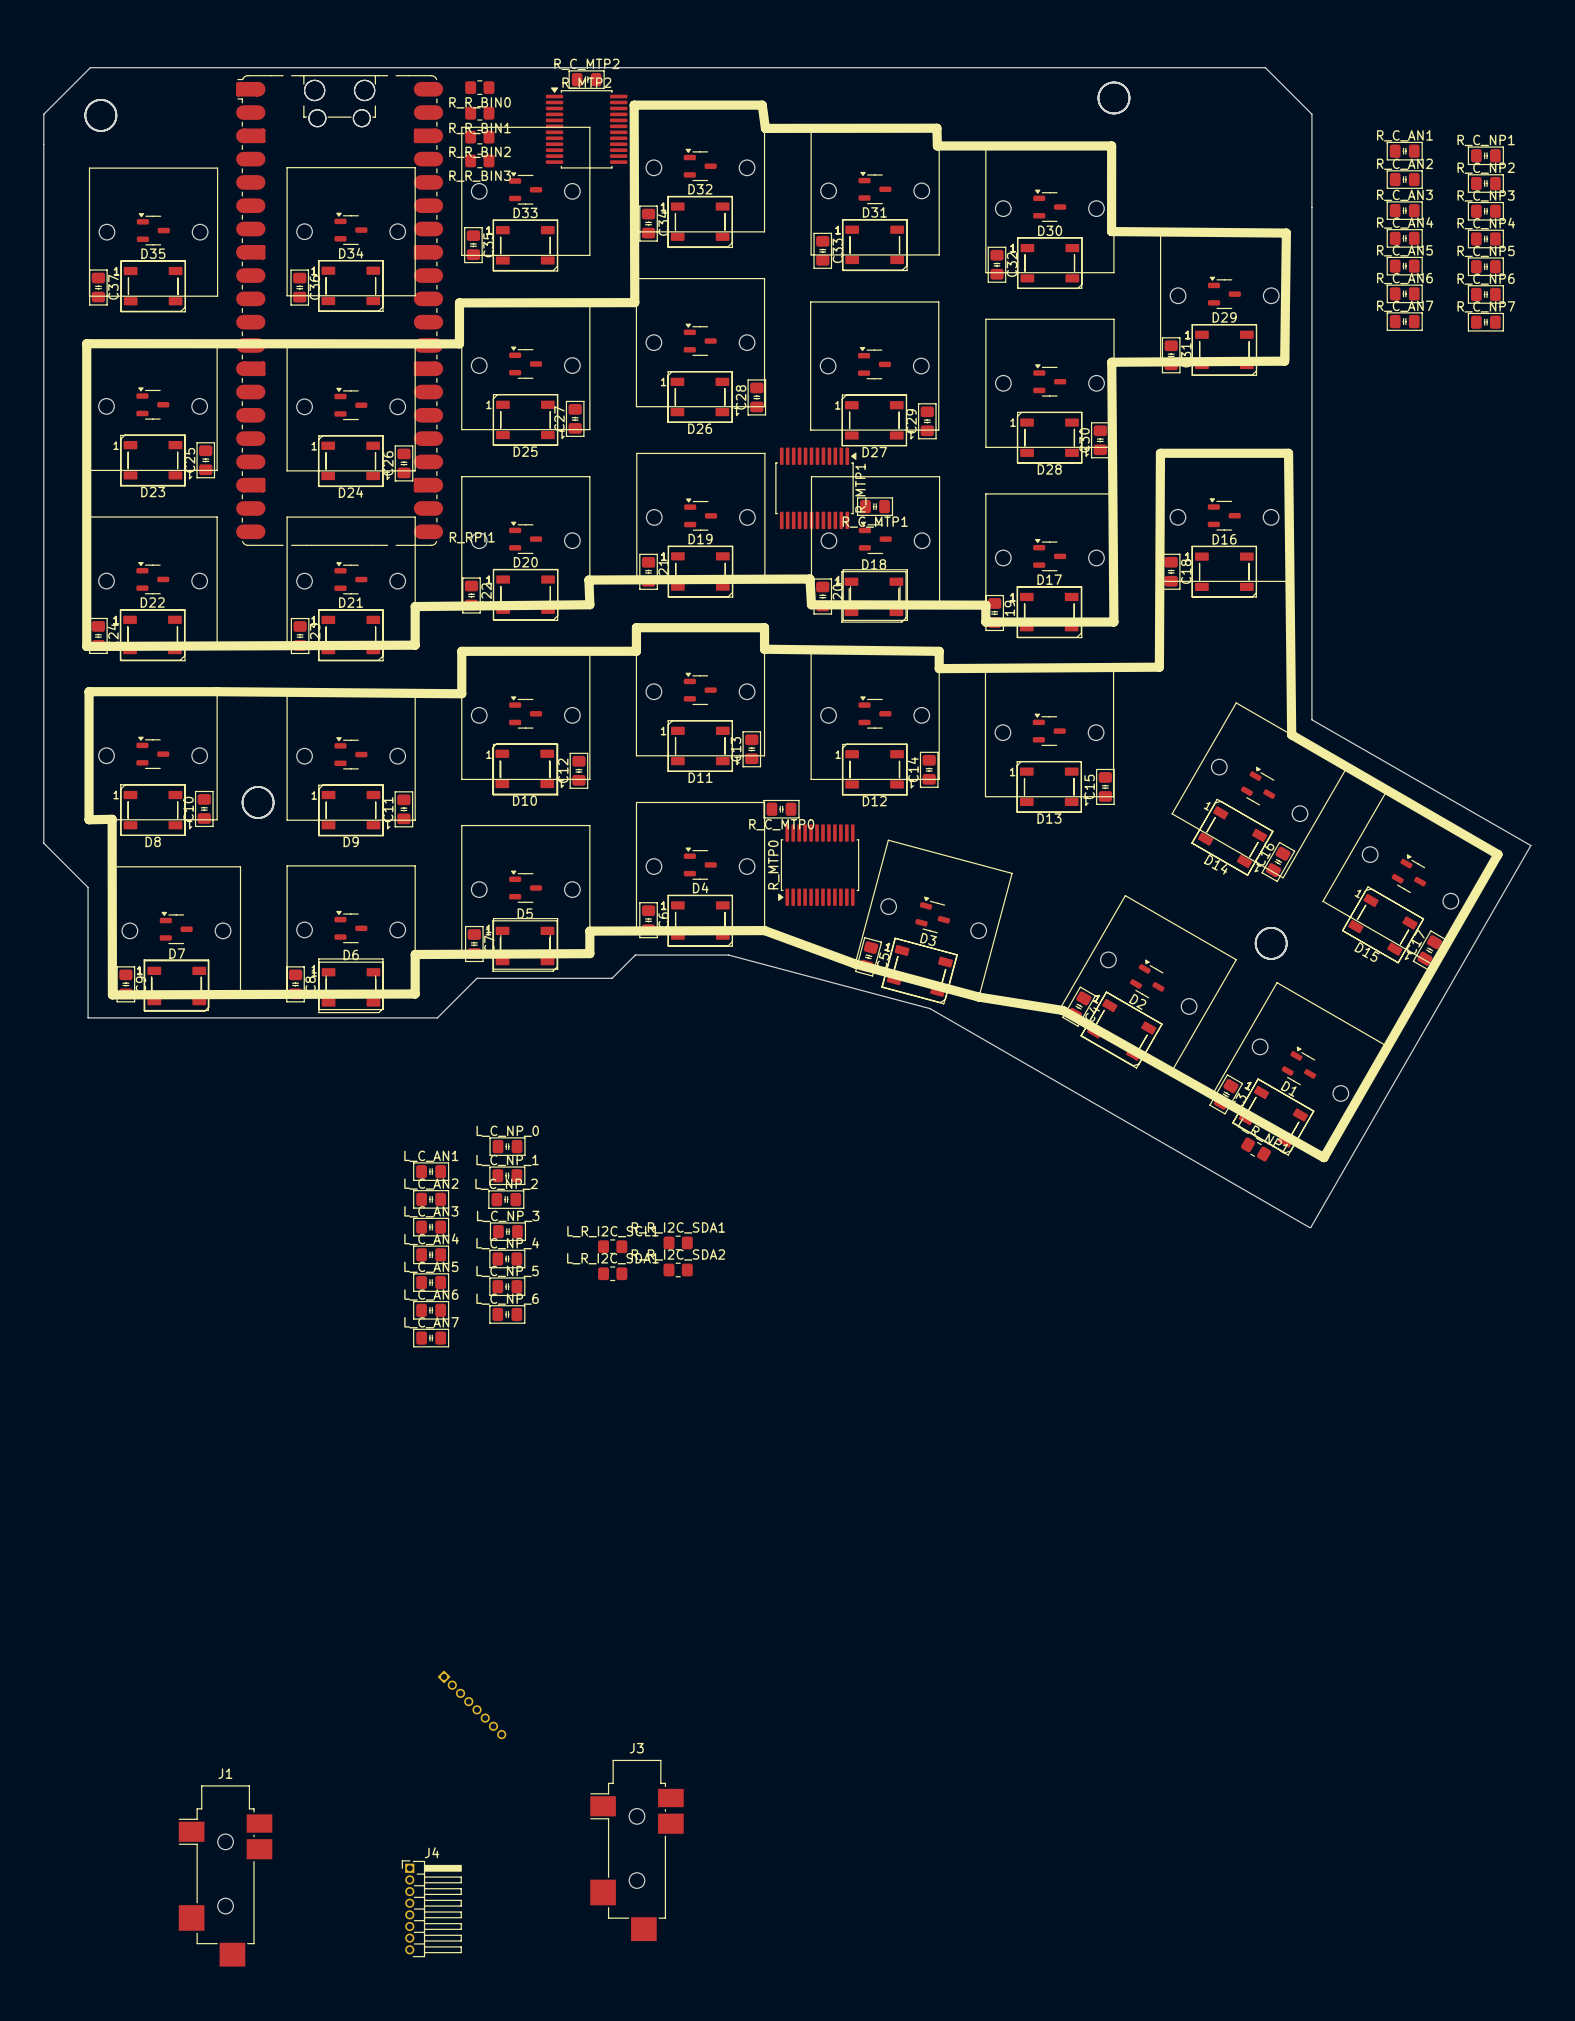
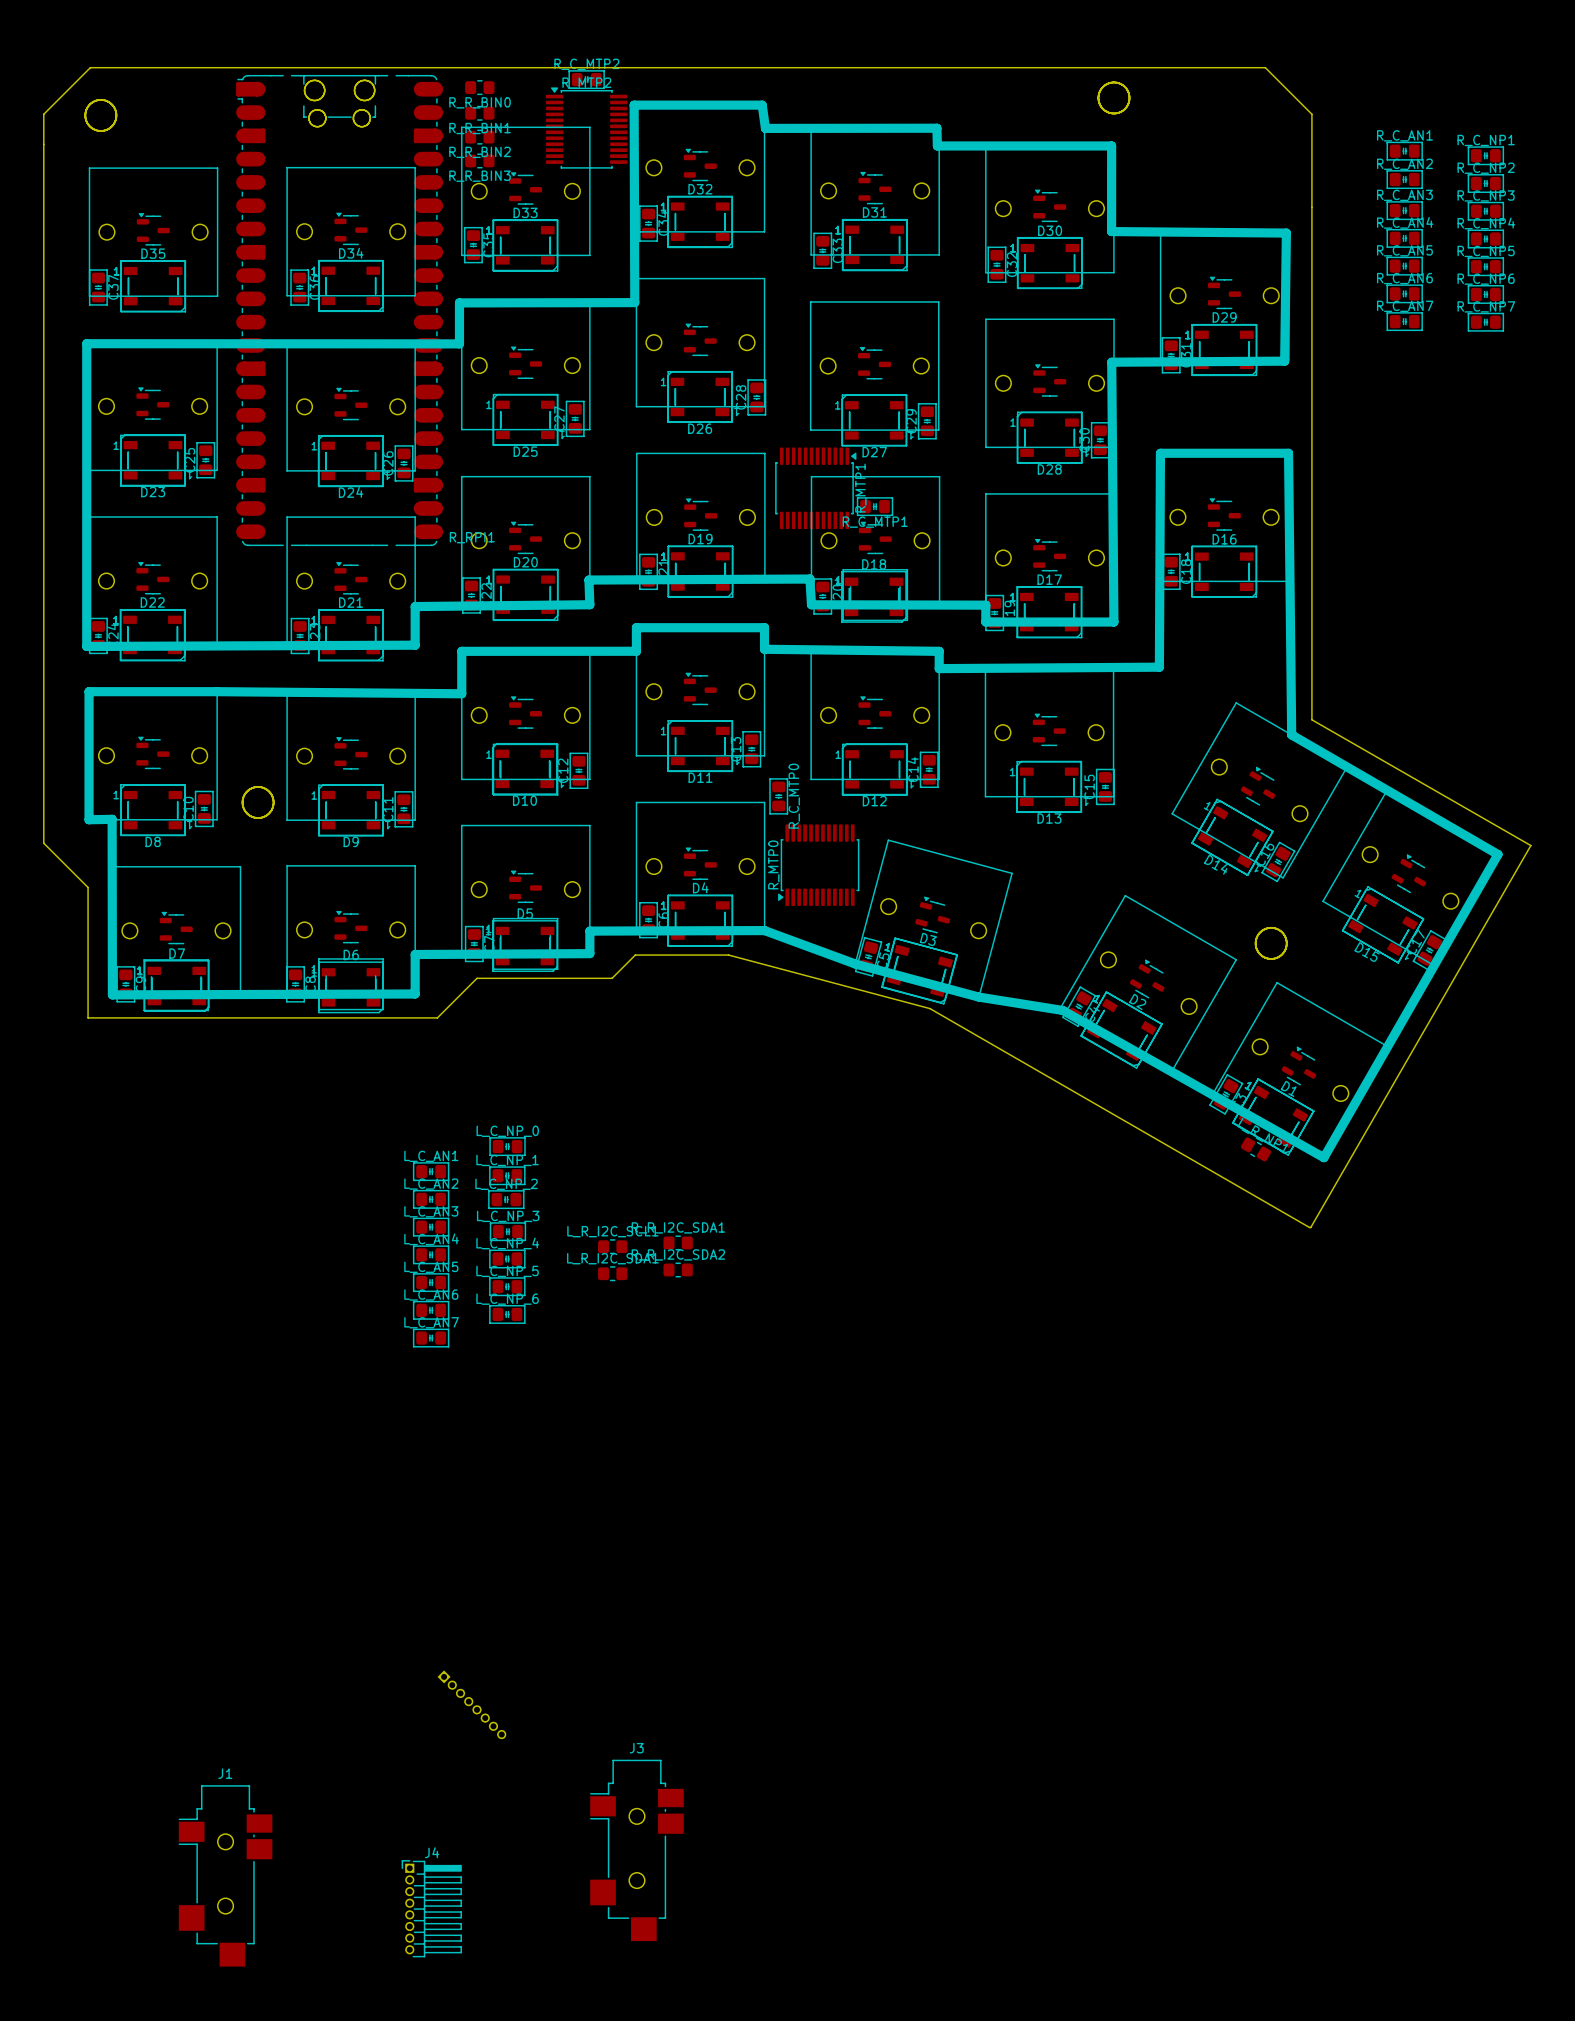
R_C_MTP0 rotation: 0° (781, 809) -> 90° counterclockwise (778, 796)

